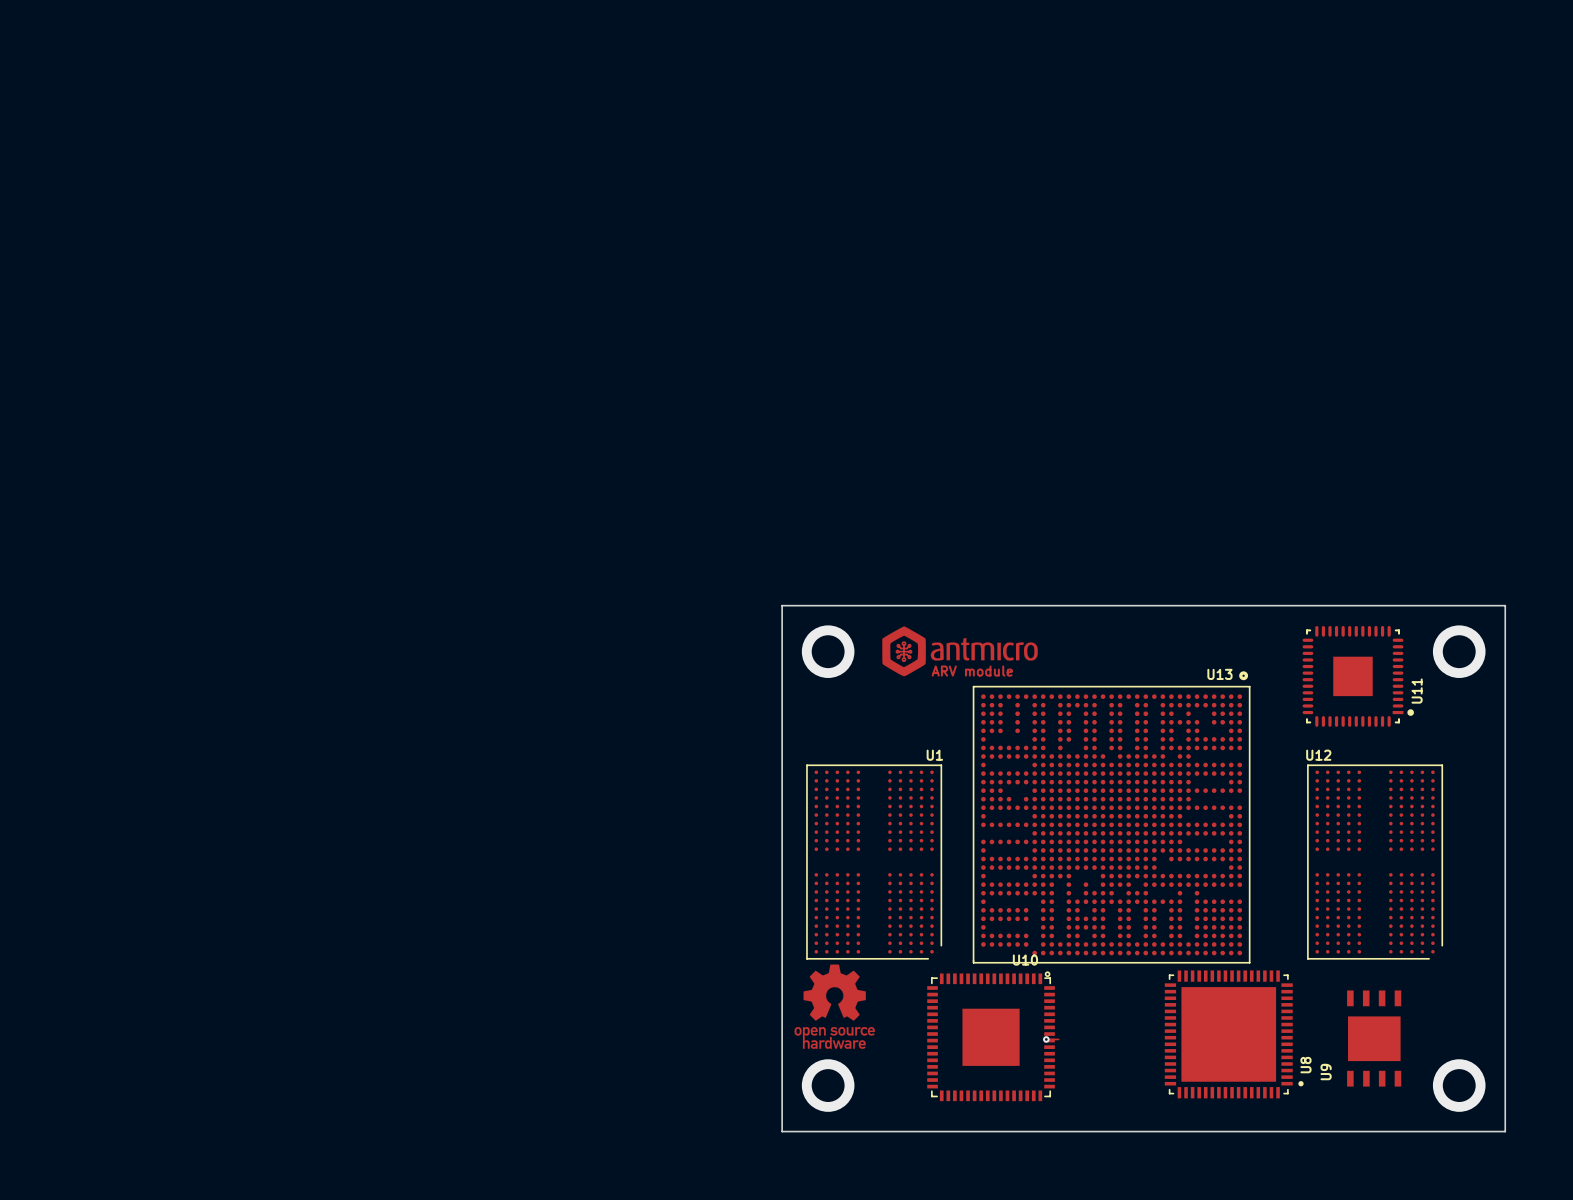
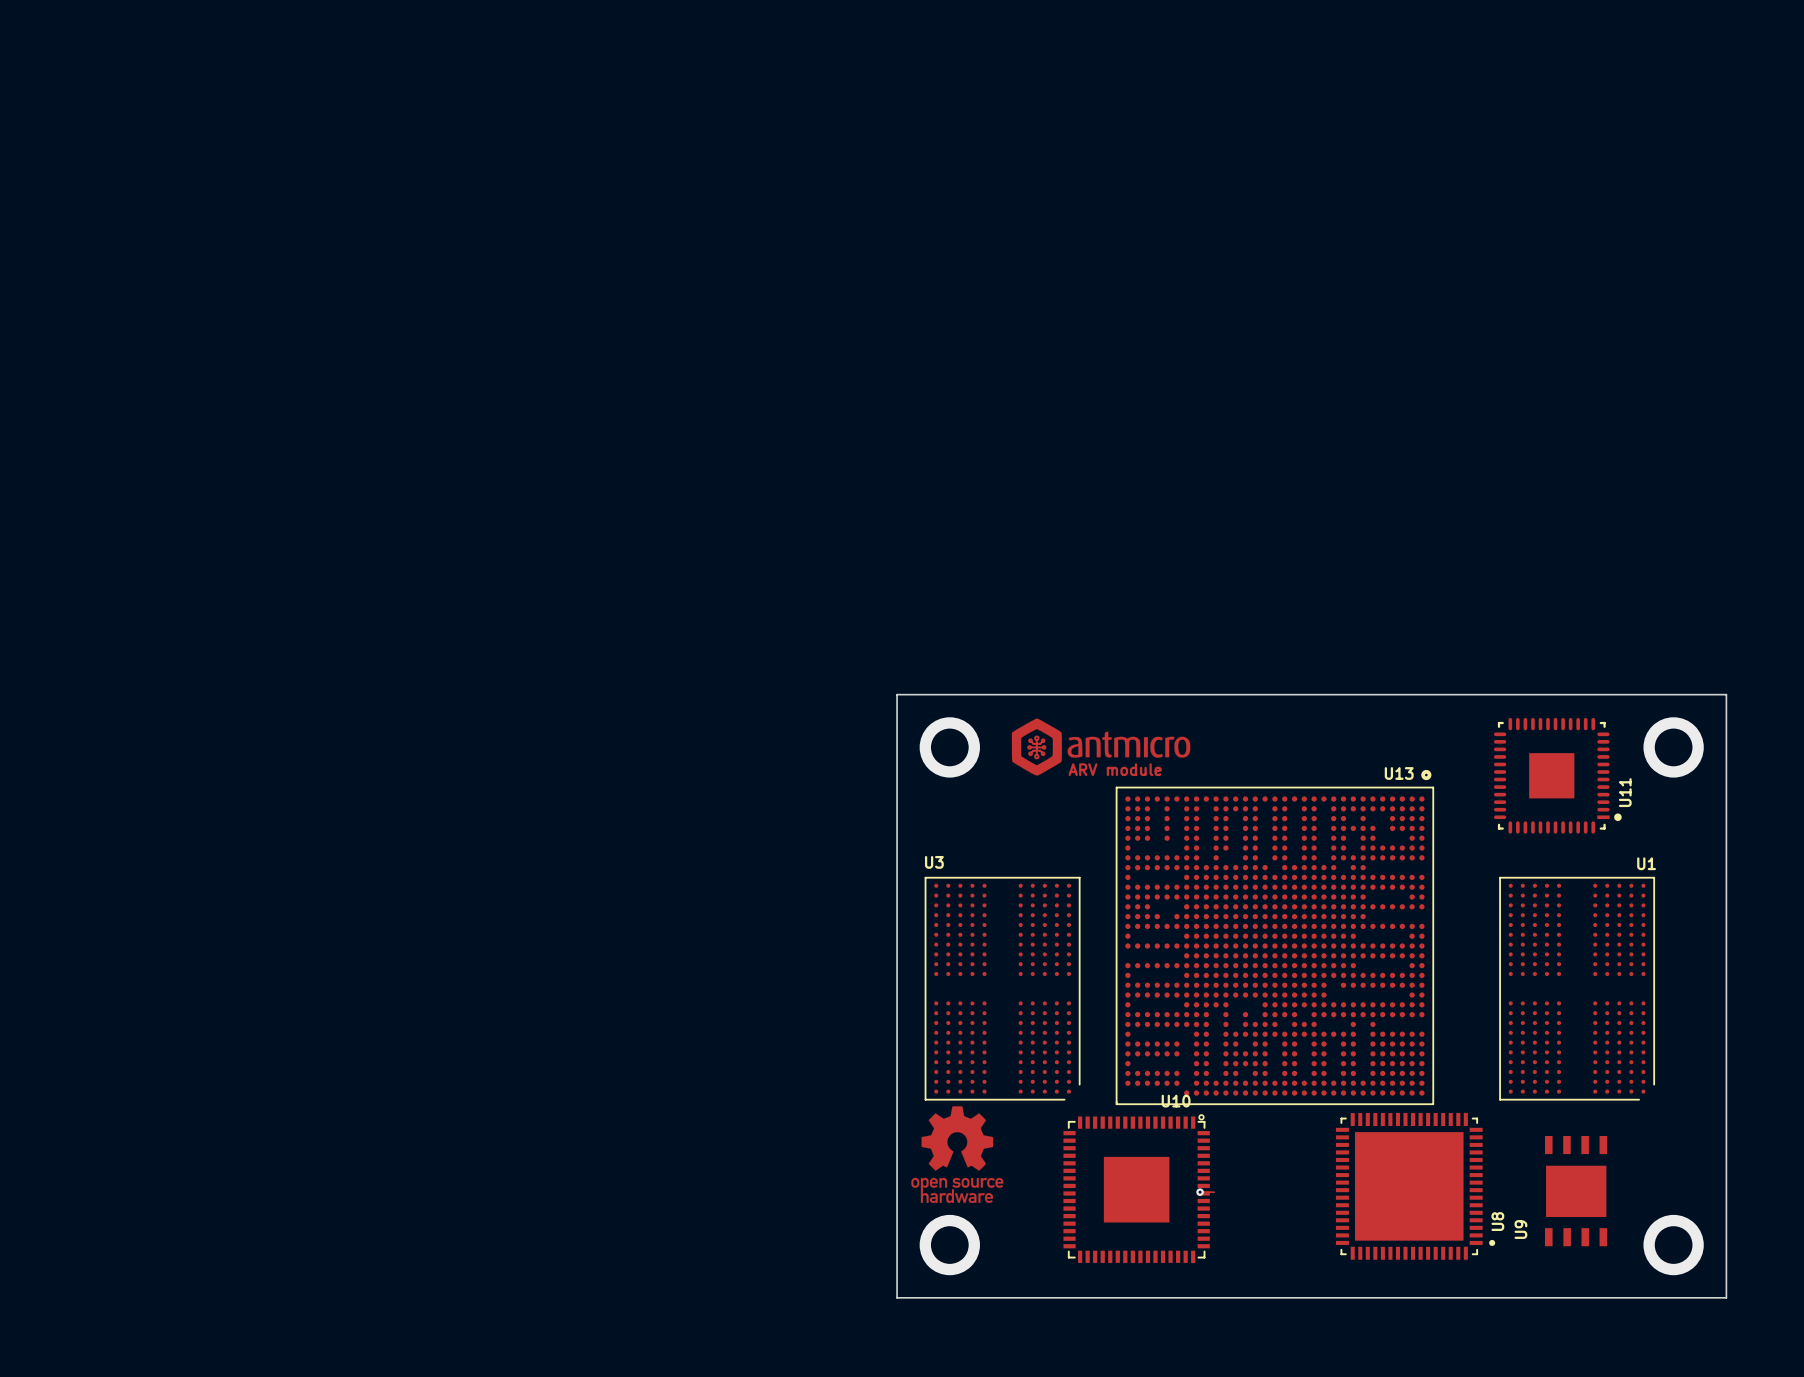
U1 name: U1 (934, 755) -> U3 (934, 862)
U12 name: U12 (1318, 755) -> U1 (1646, 863)

